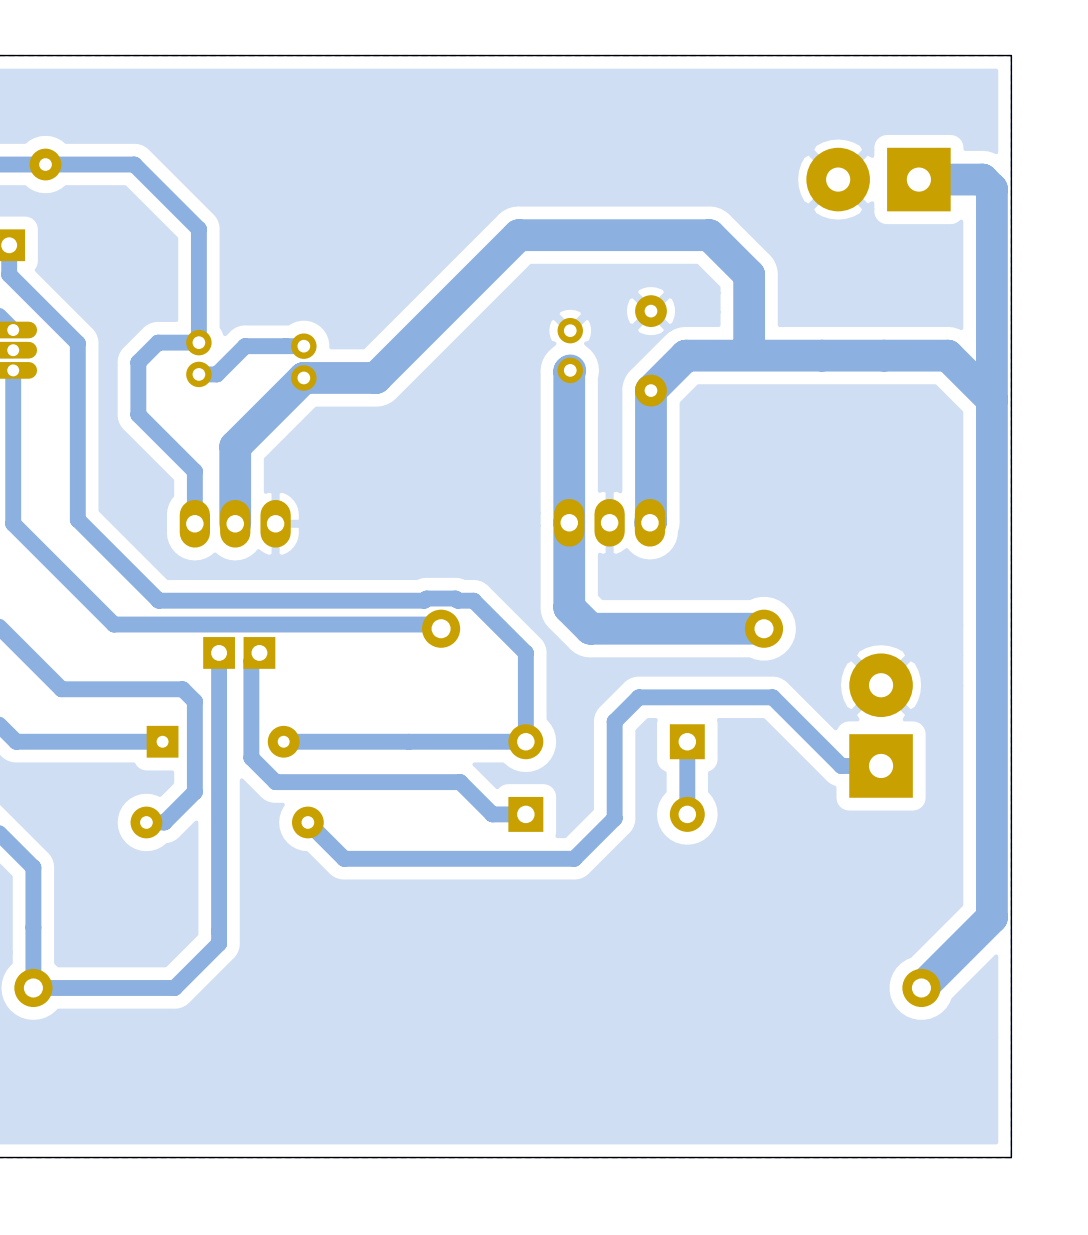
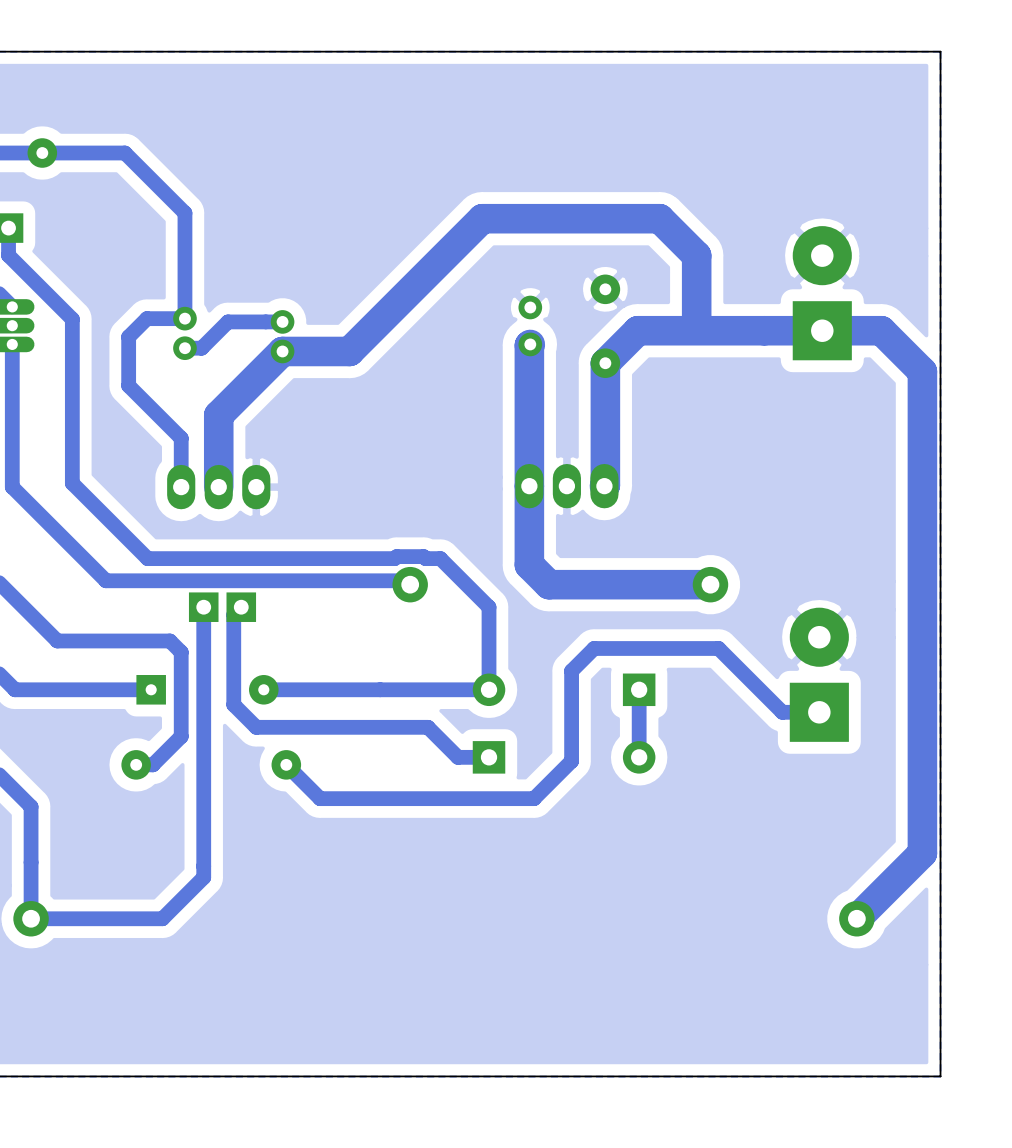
part rotation: 0° (878, 179) -> 90° clockwise (822, 293)
part position: (878, 179) -> (822, 293)
bottom track: (918, 179) (982, 179) (991, 189) (991, 399) -> none

